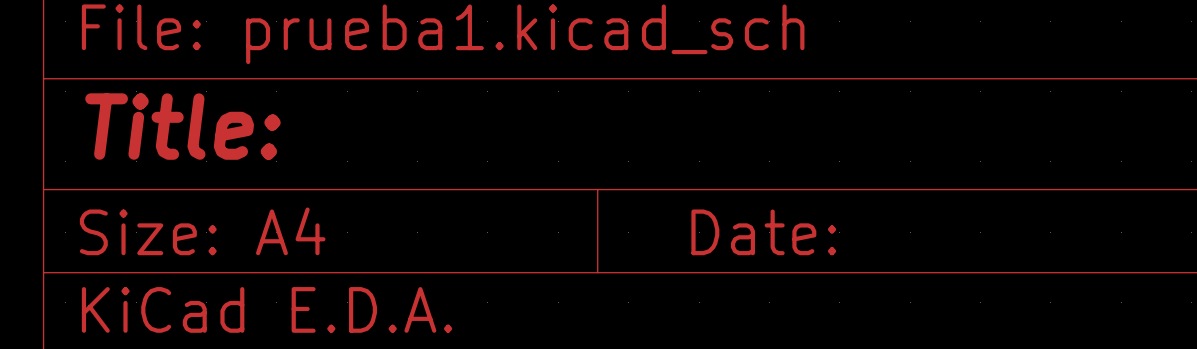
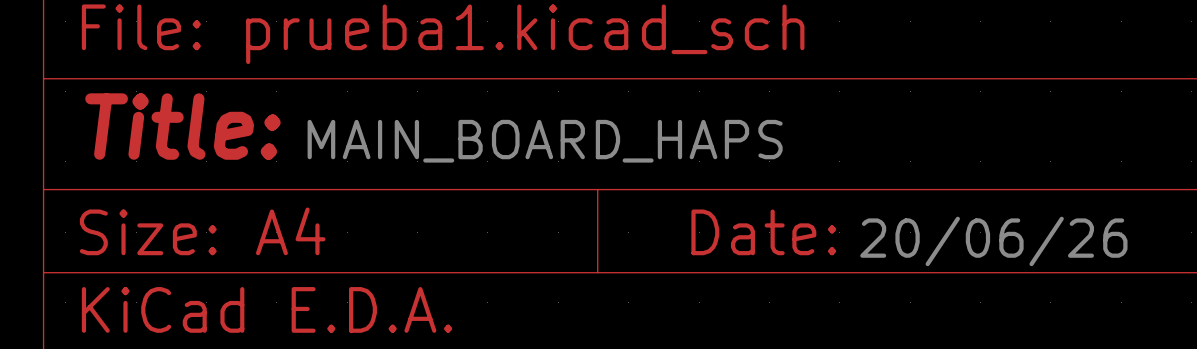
text: none -> MAIN_BOARD_HAPS (545, 141)
text: none -> 20/06/26 (993, 241)

